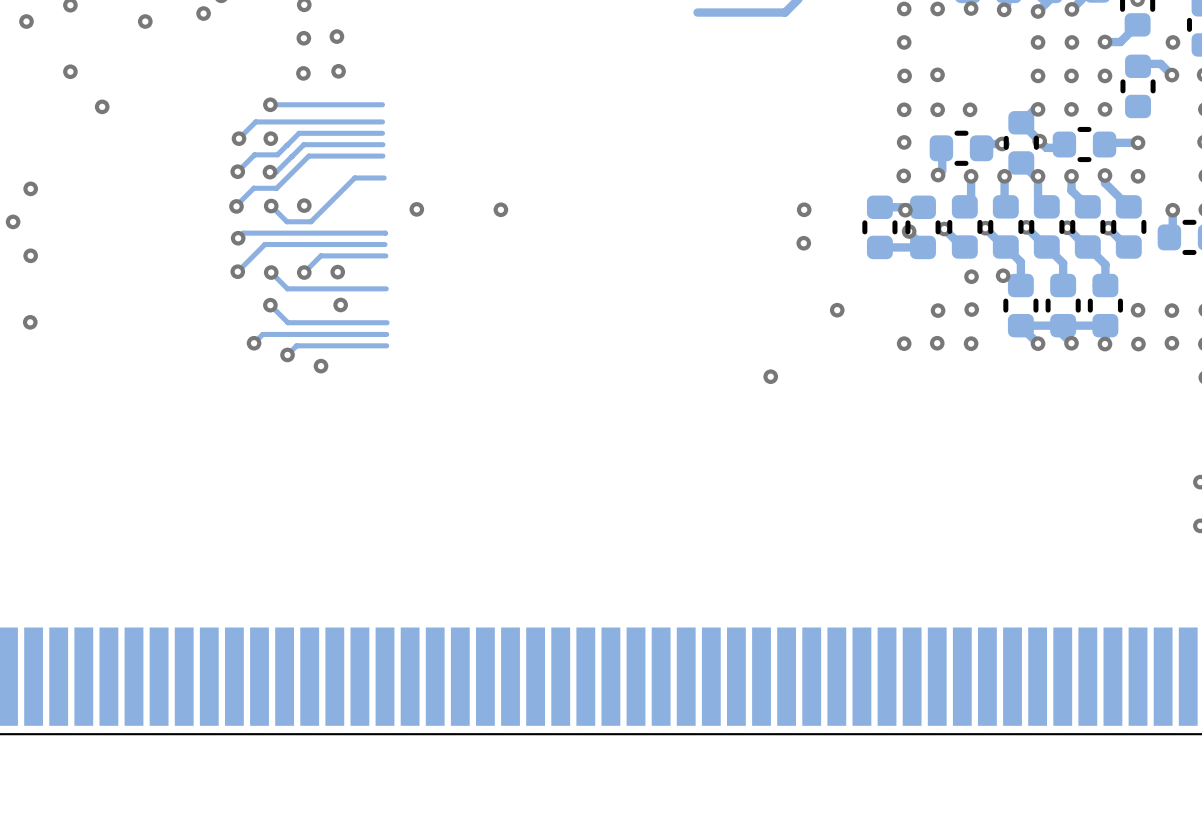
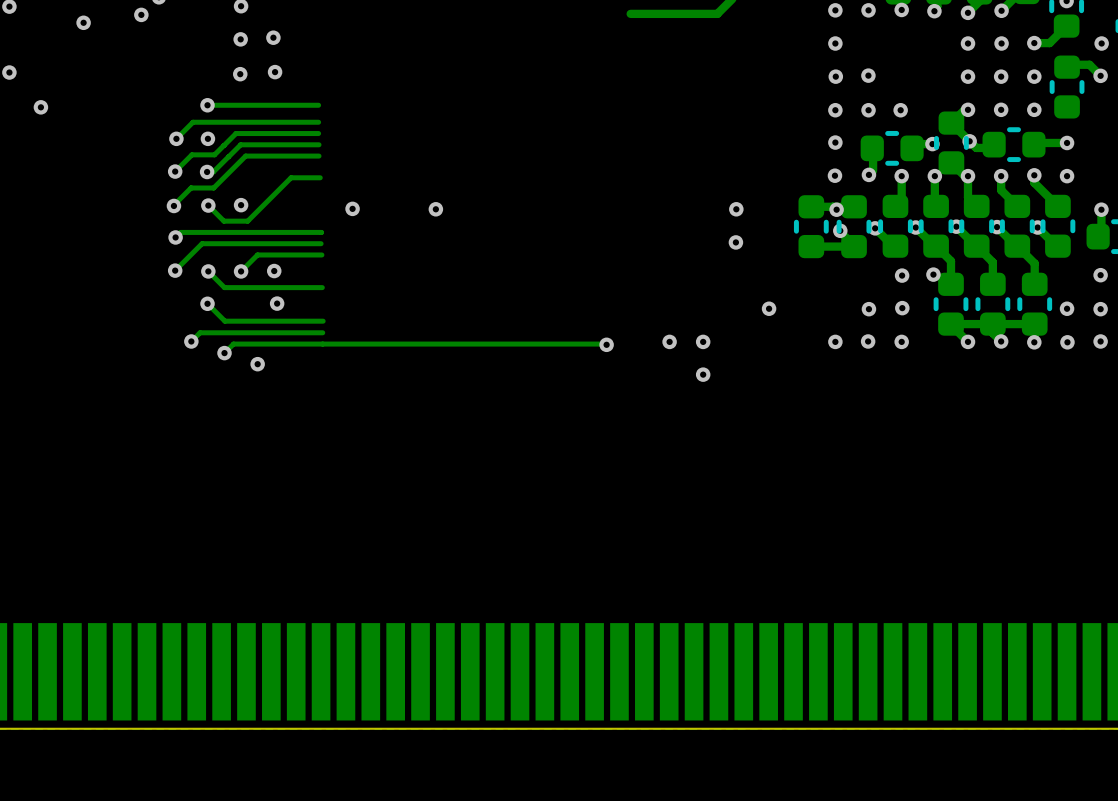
via: none -> (1100, 275)
via: none -> (669, 341)
via: none -> (703, 341)
track: none -> (322, 344) (606, 344)
via: none -> (606, 344)

